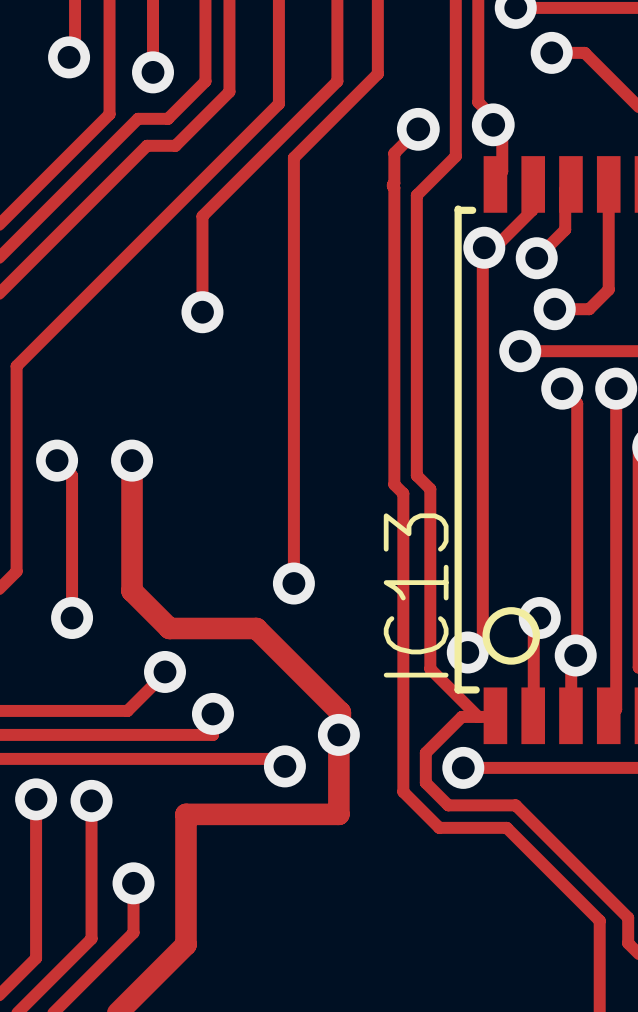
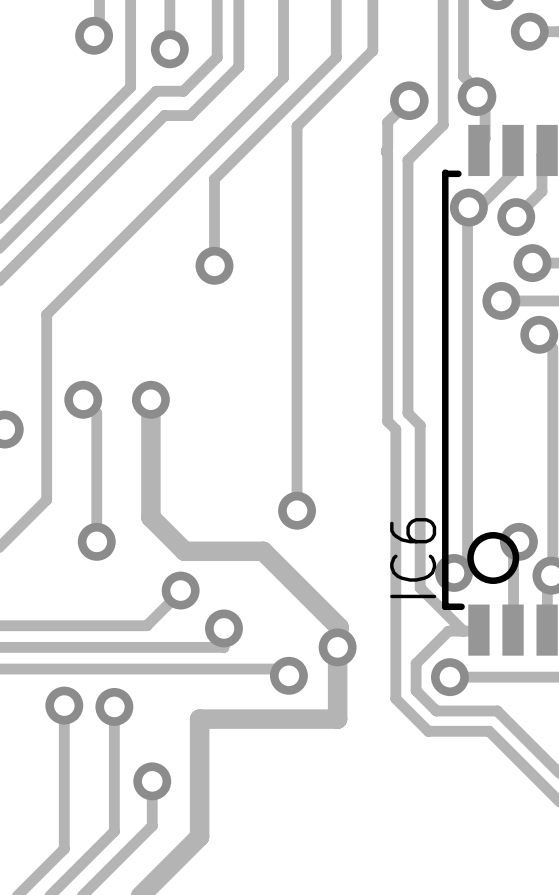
IC13 name: IC13 (416, 595) -> IC6 (413, 558)

